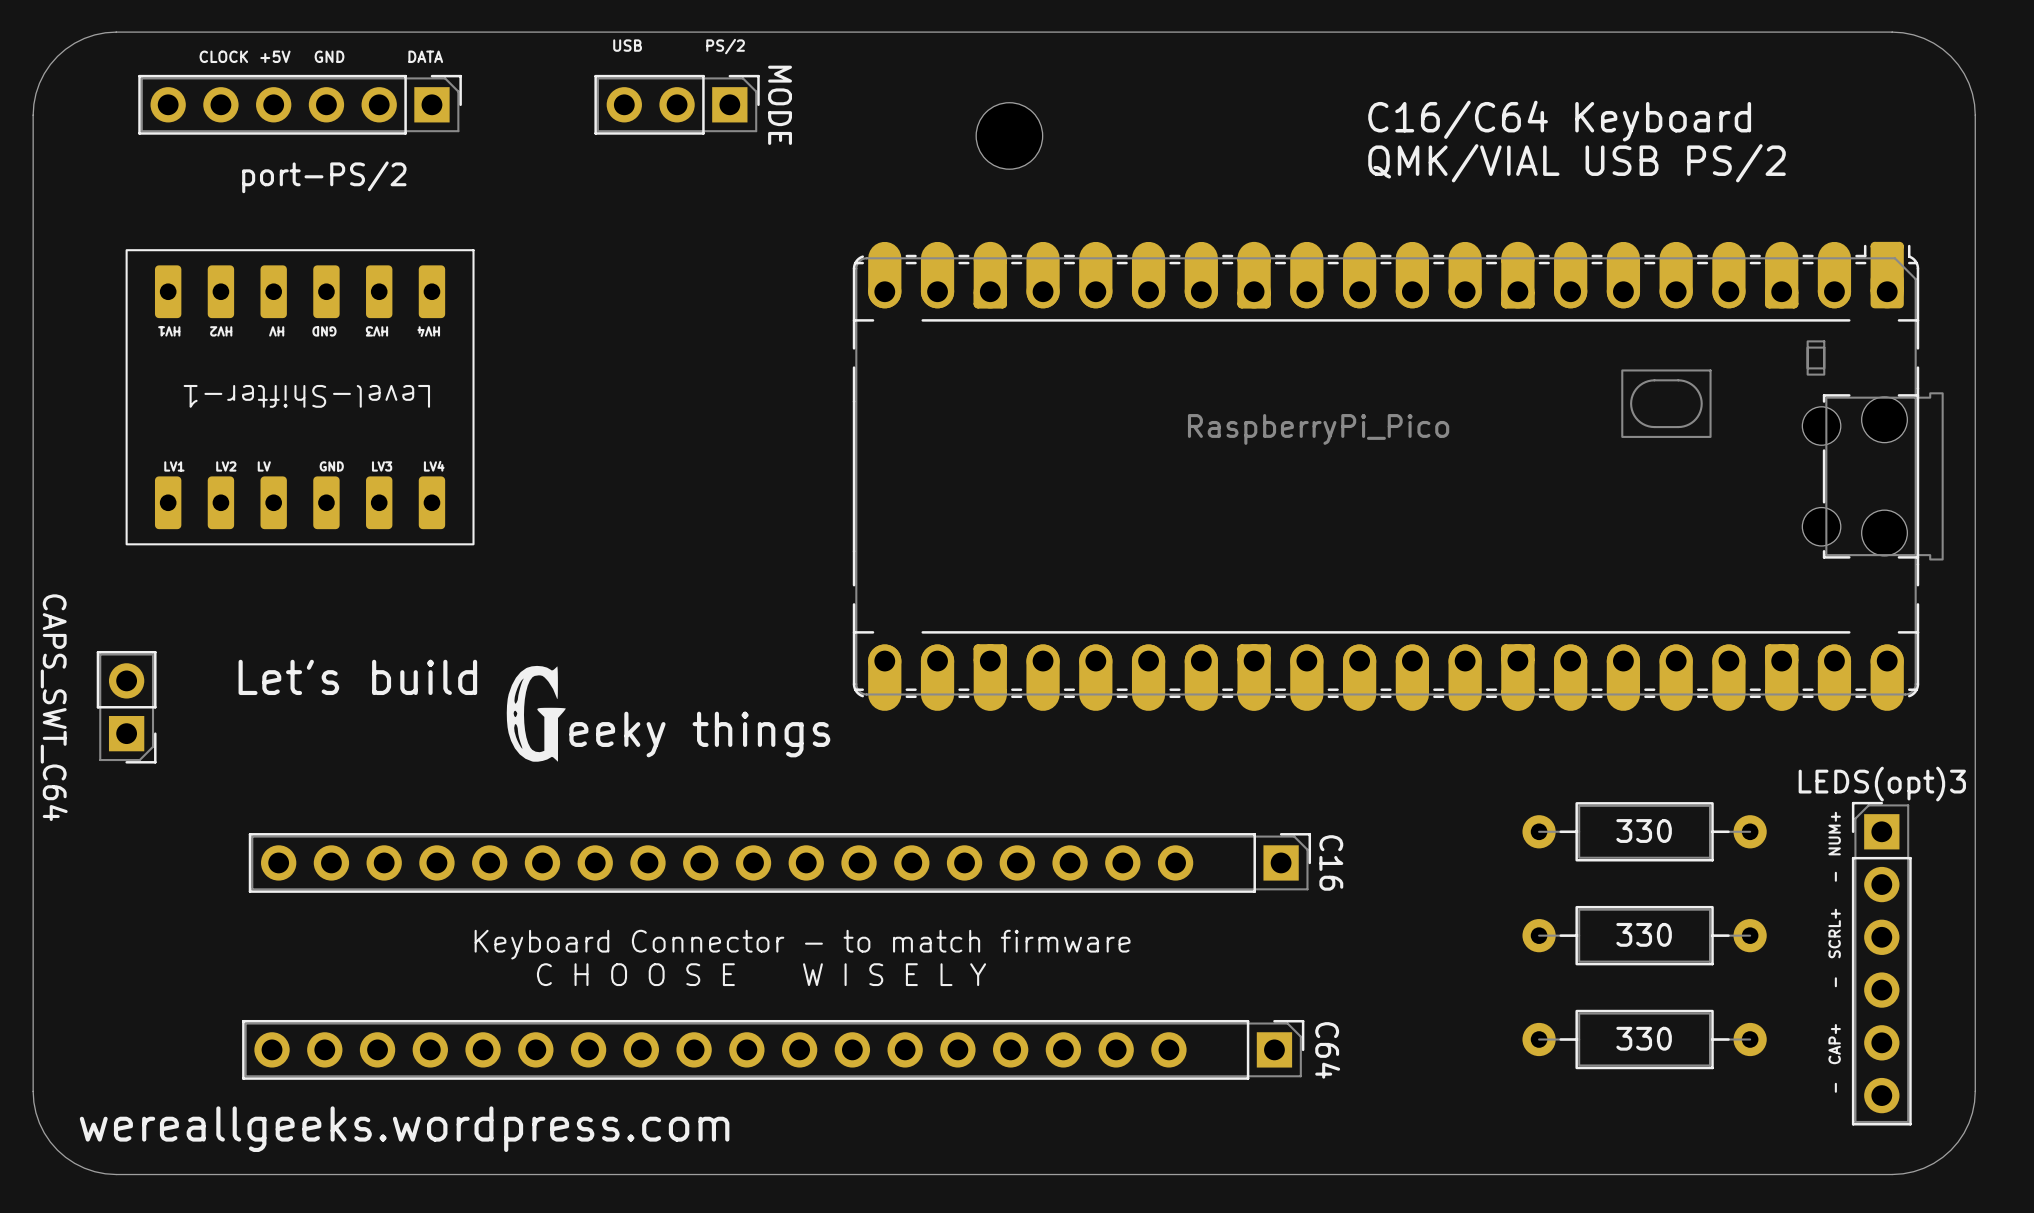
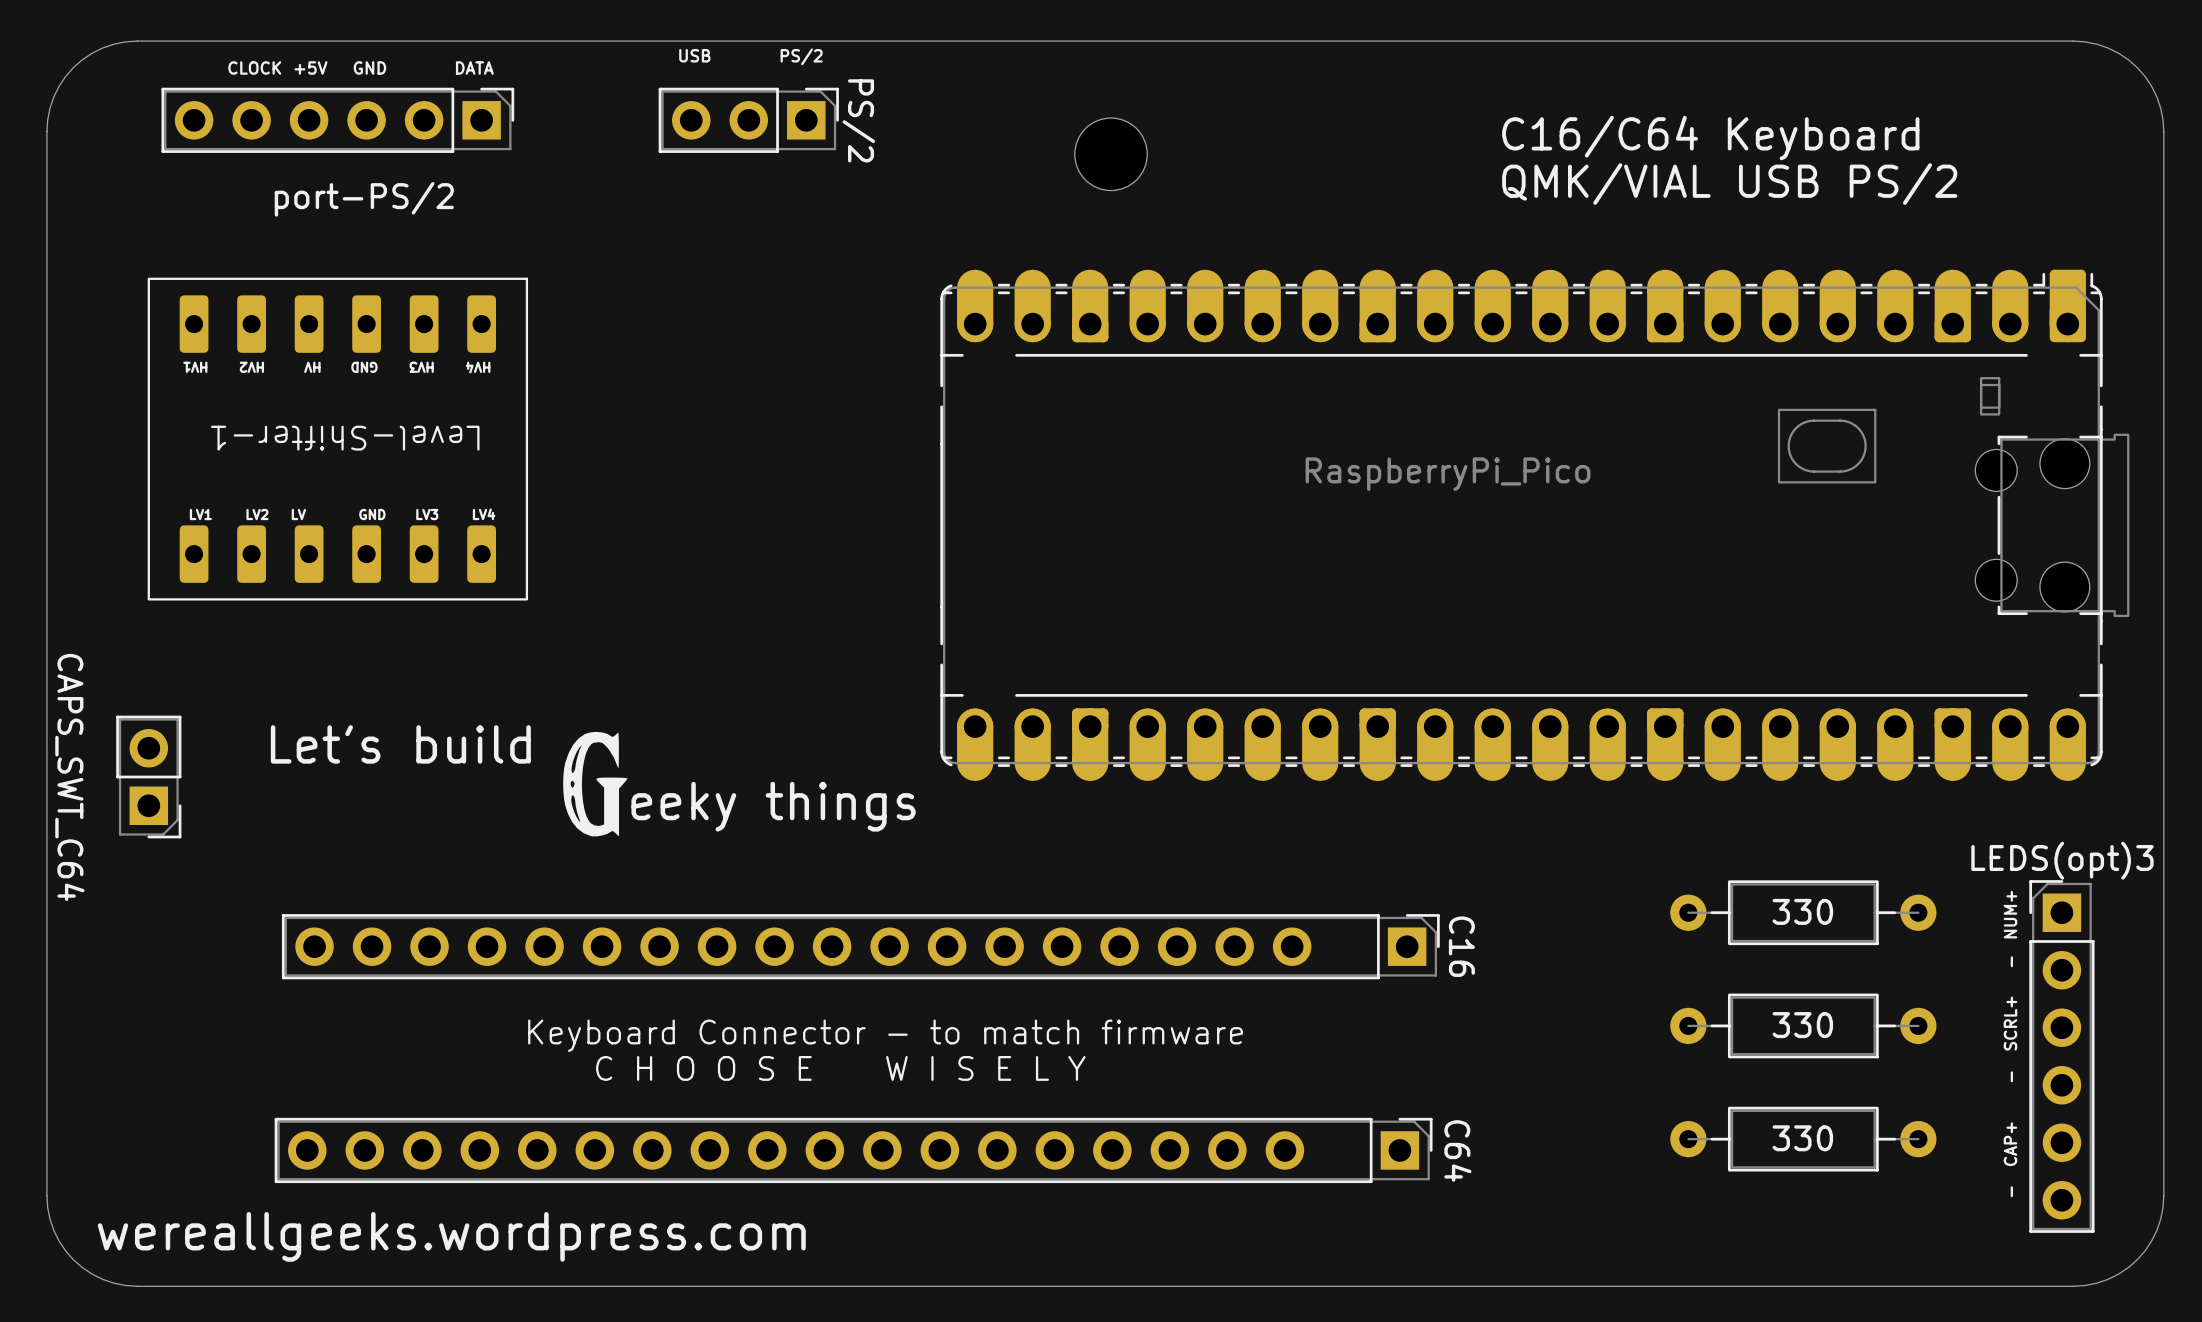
MODE name: MODE (780, 105) -> PS/2 (858, 120)

